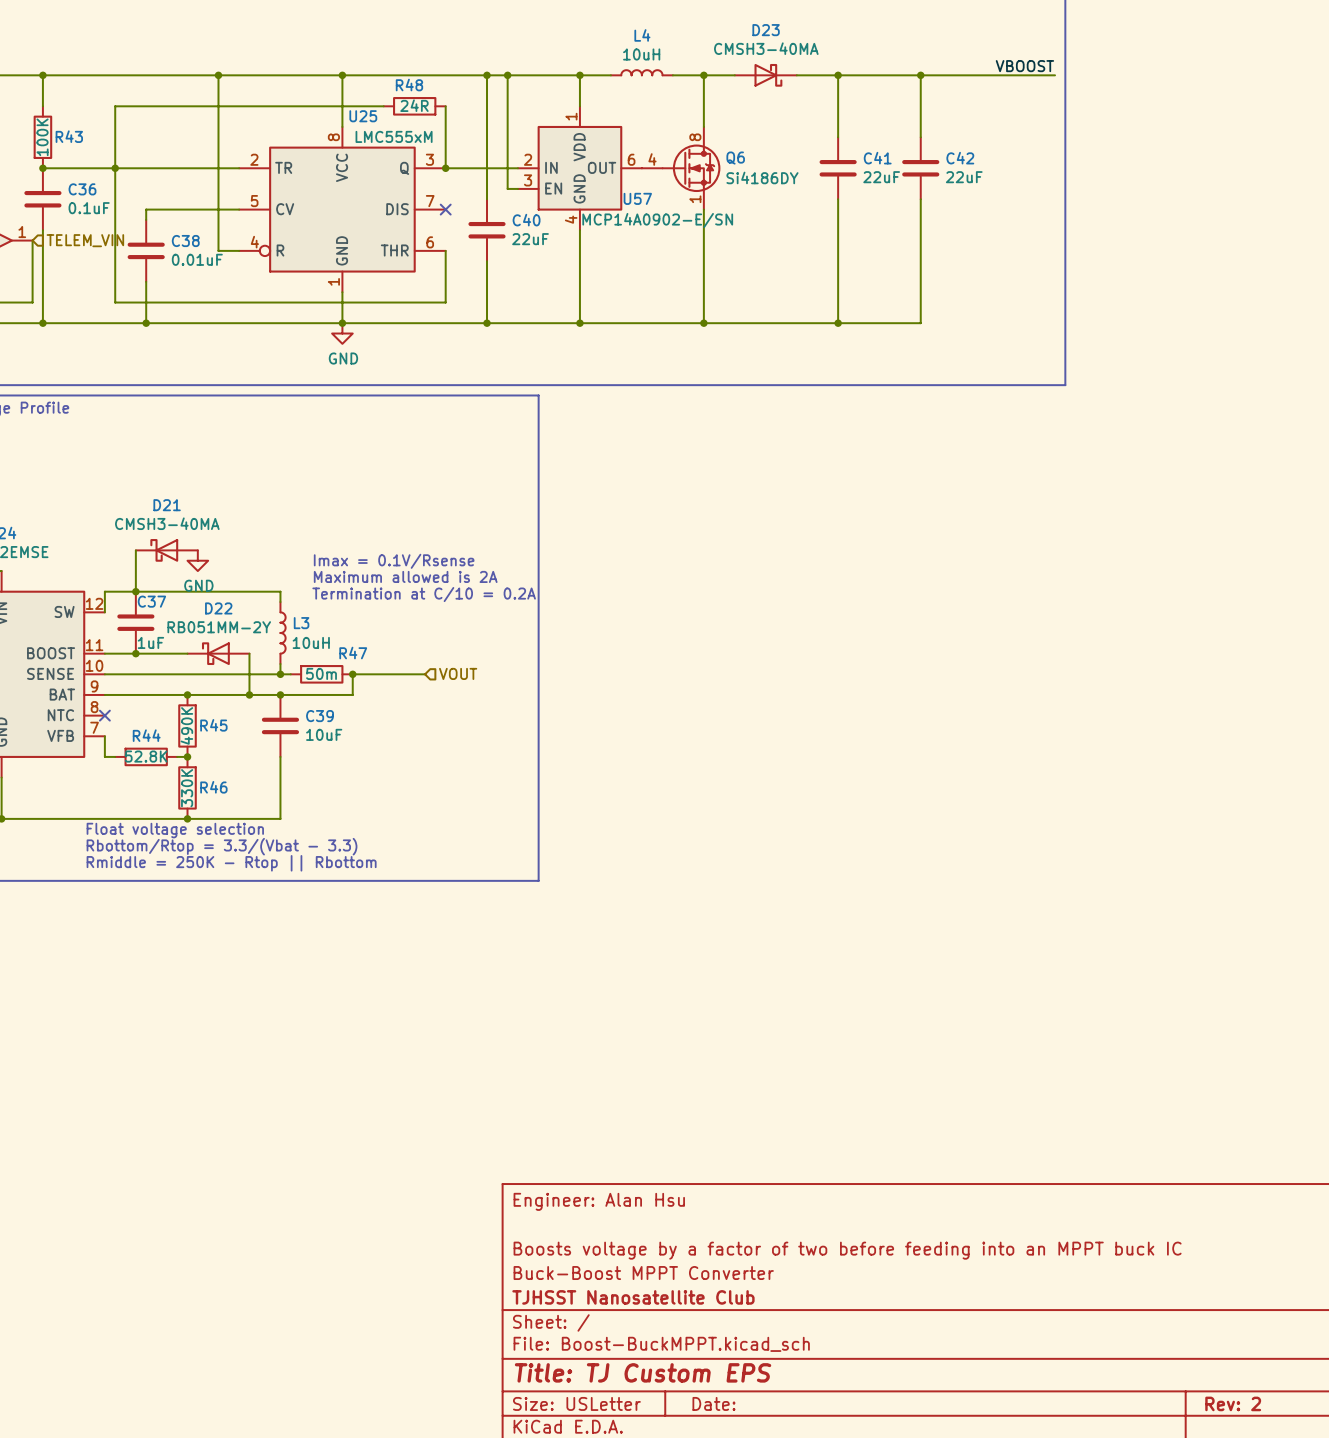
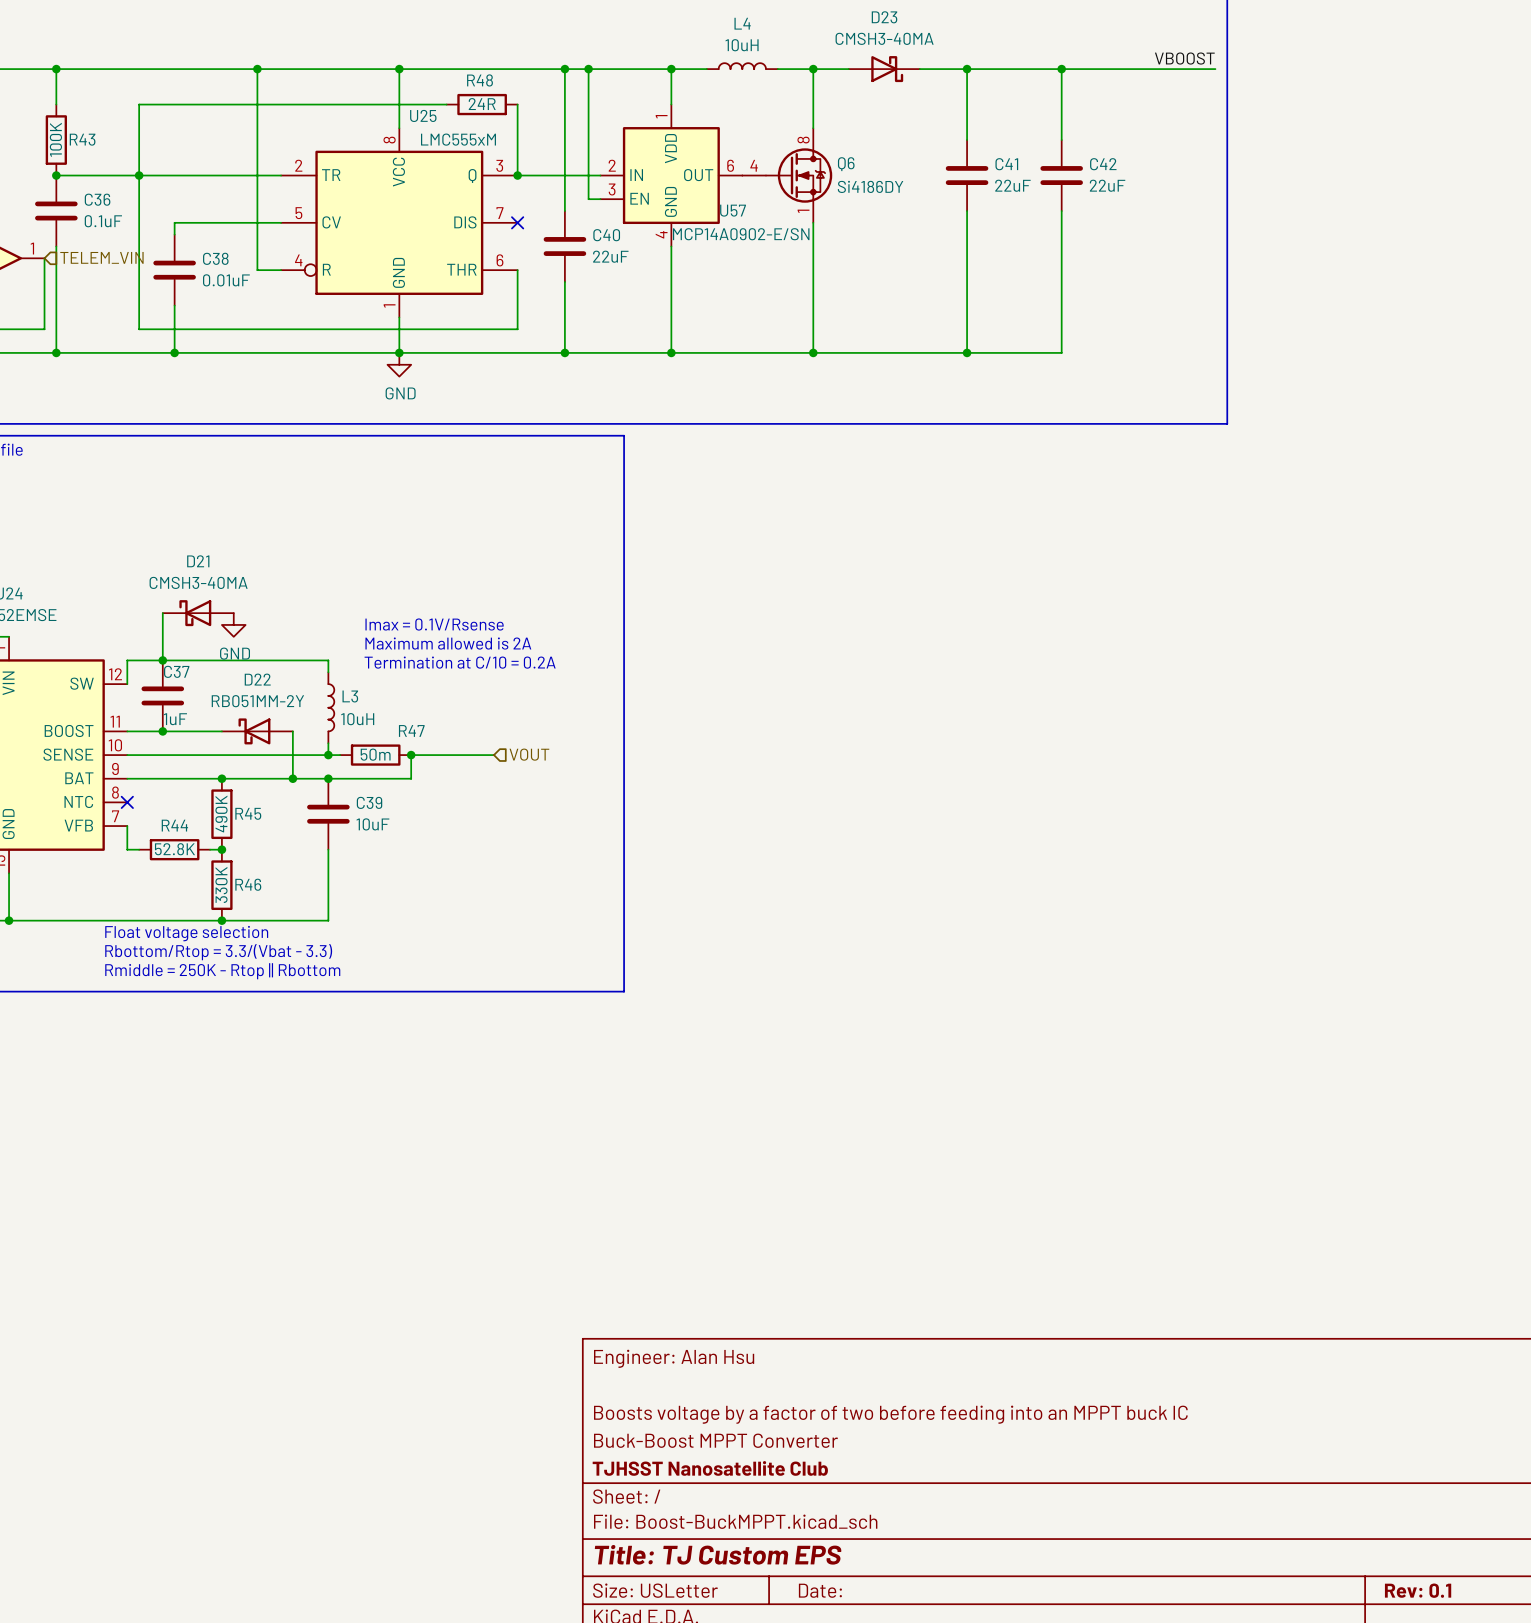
title block: Rev: 2 (1233, 1403) -> Rev: 0.1 (1418, 1590)

